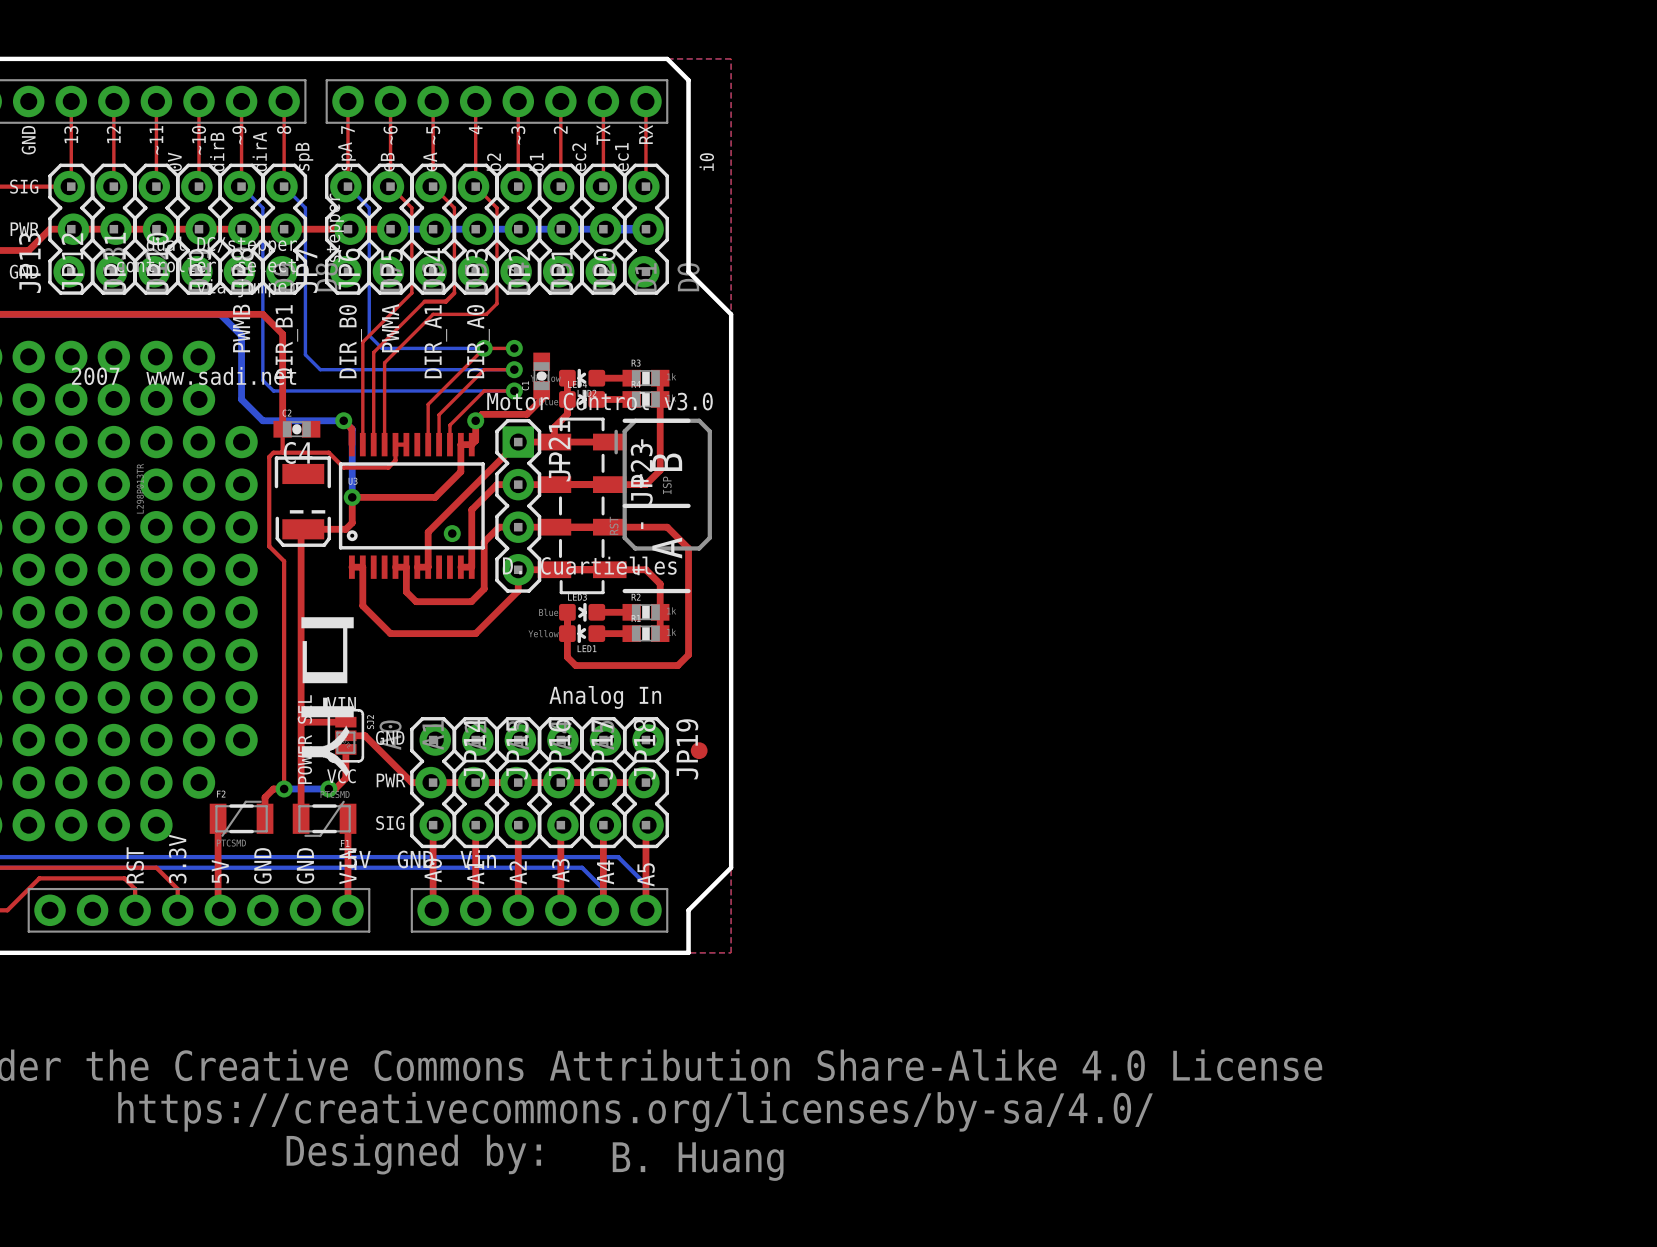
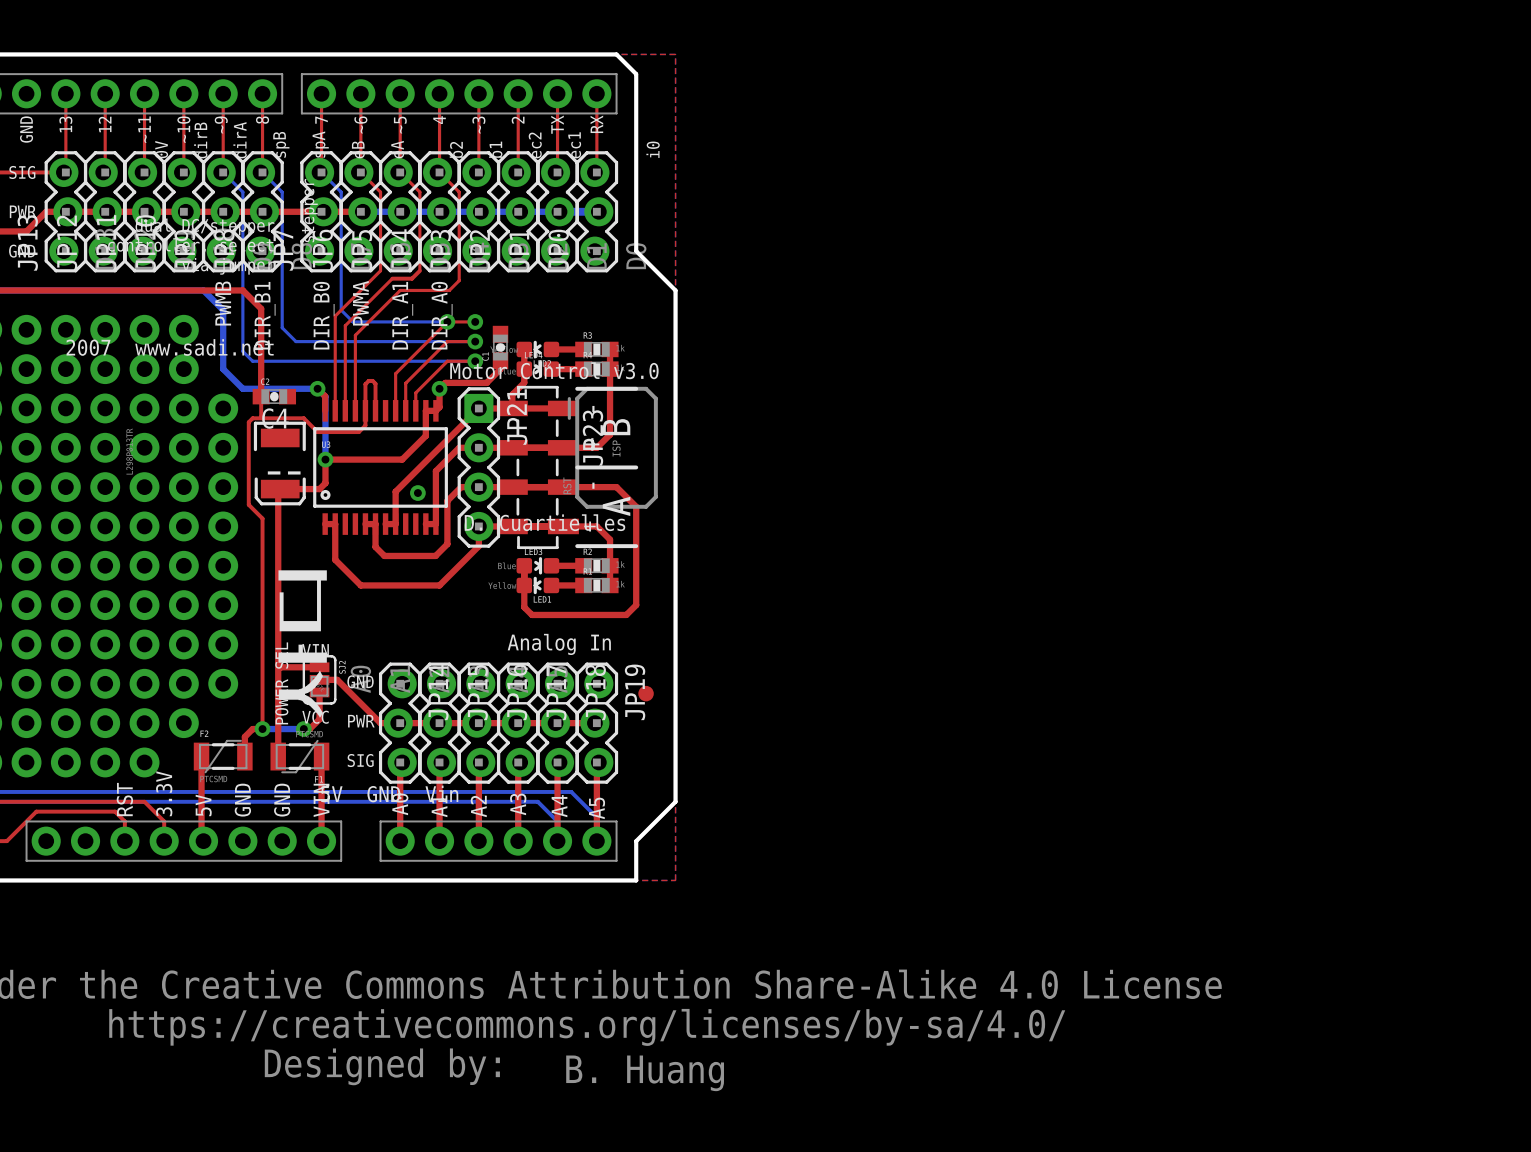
top track: (395, 444) (406, 444) -> (365, 410) (365, 384) (368, 380) (372, 380) (375, 383) (375, 410)

